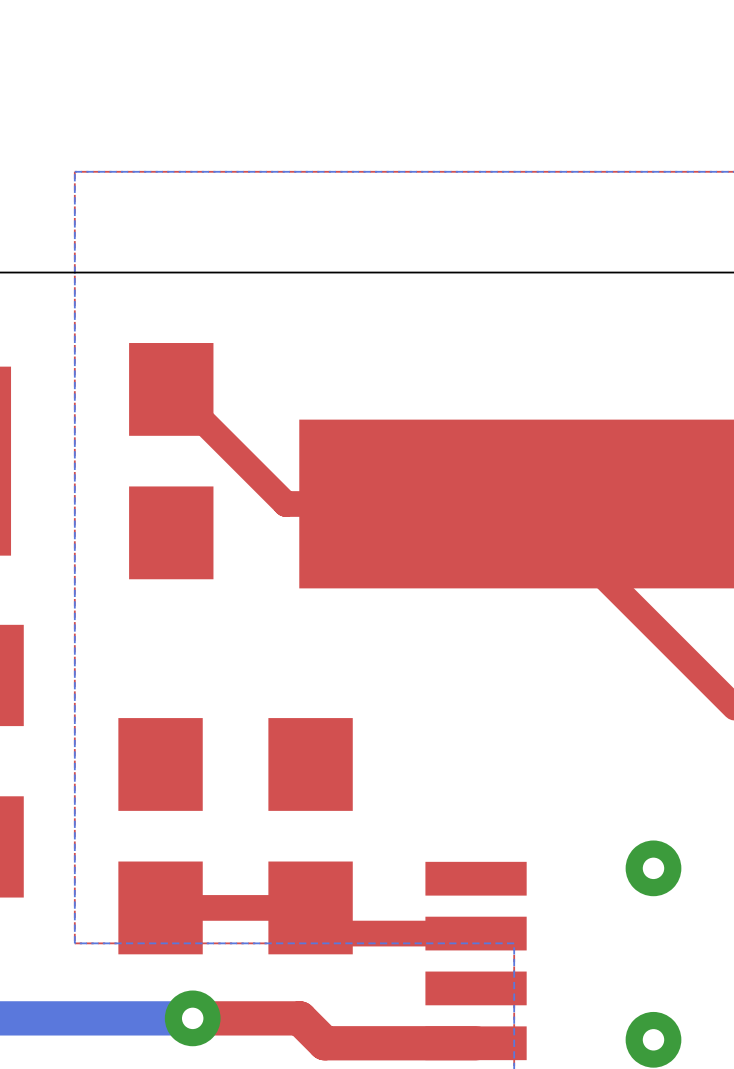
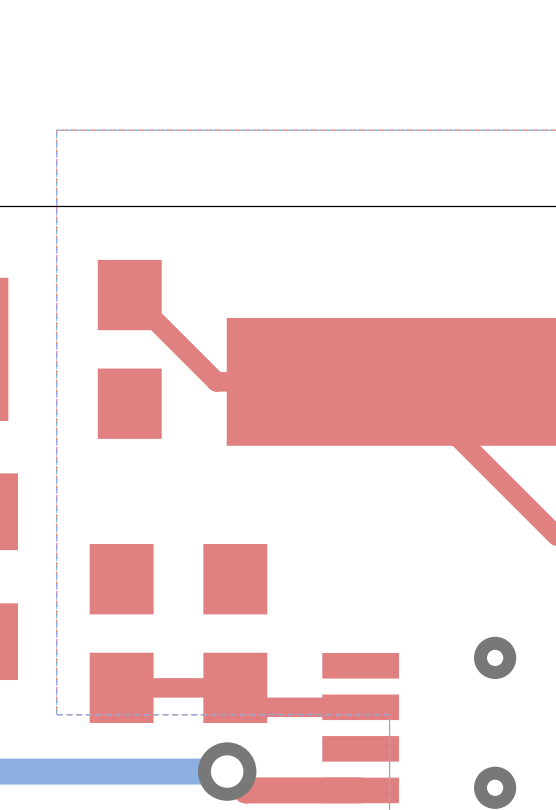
via: (192, 1018) -> none
top track: (299, 1018) (192, 1018) -> none
bottom track: none -> (227, 771) (146, 771)
via: none -> (227, 771)

